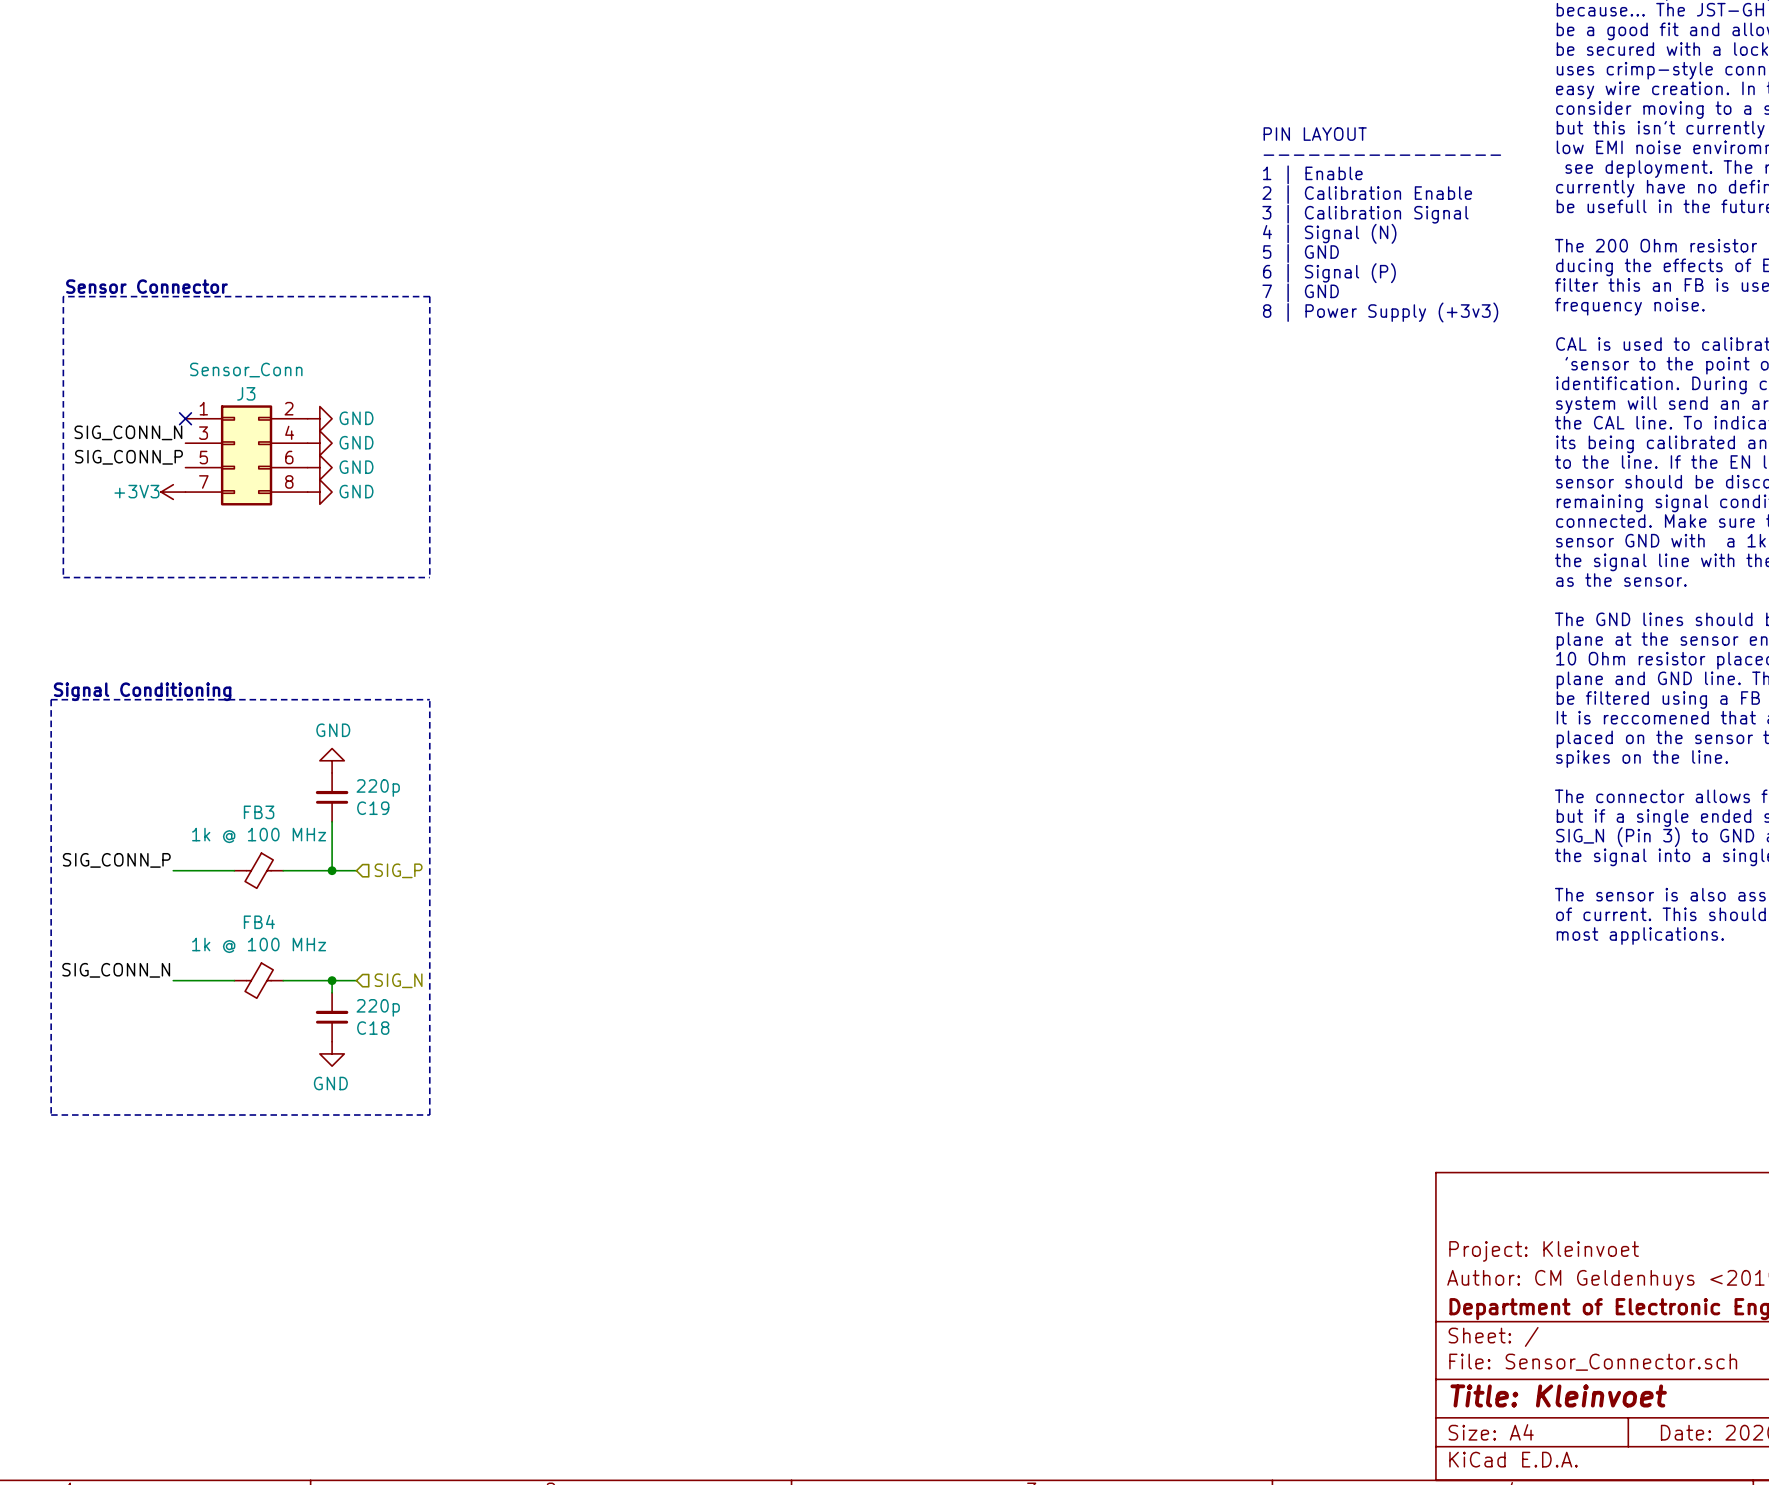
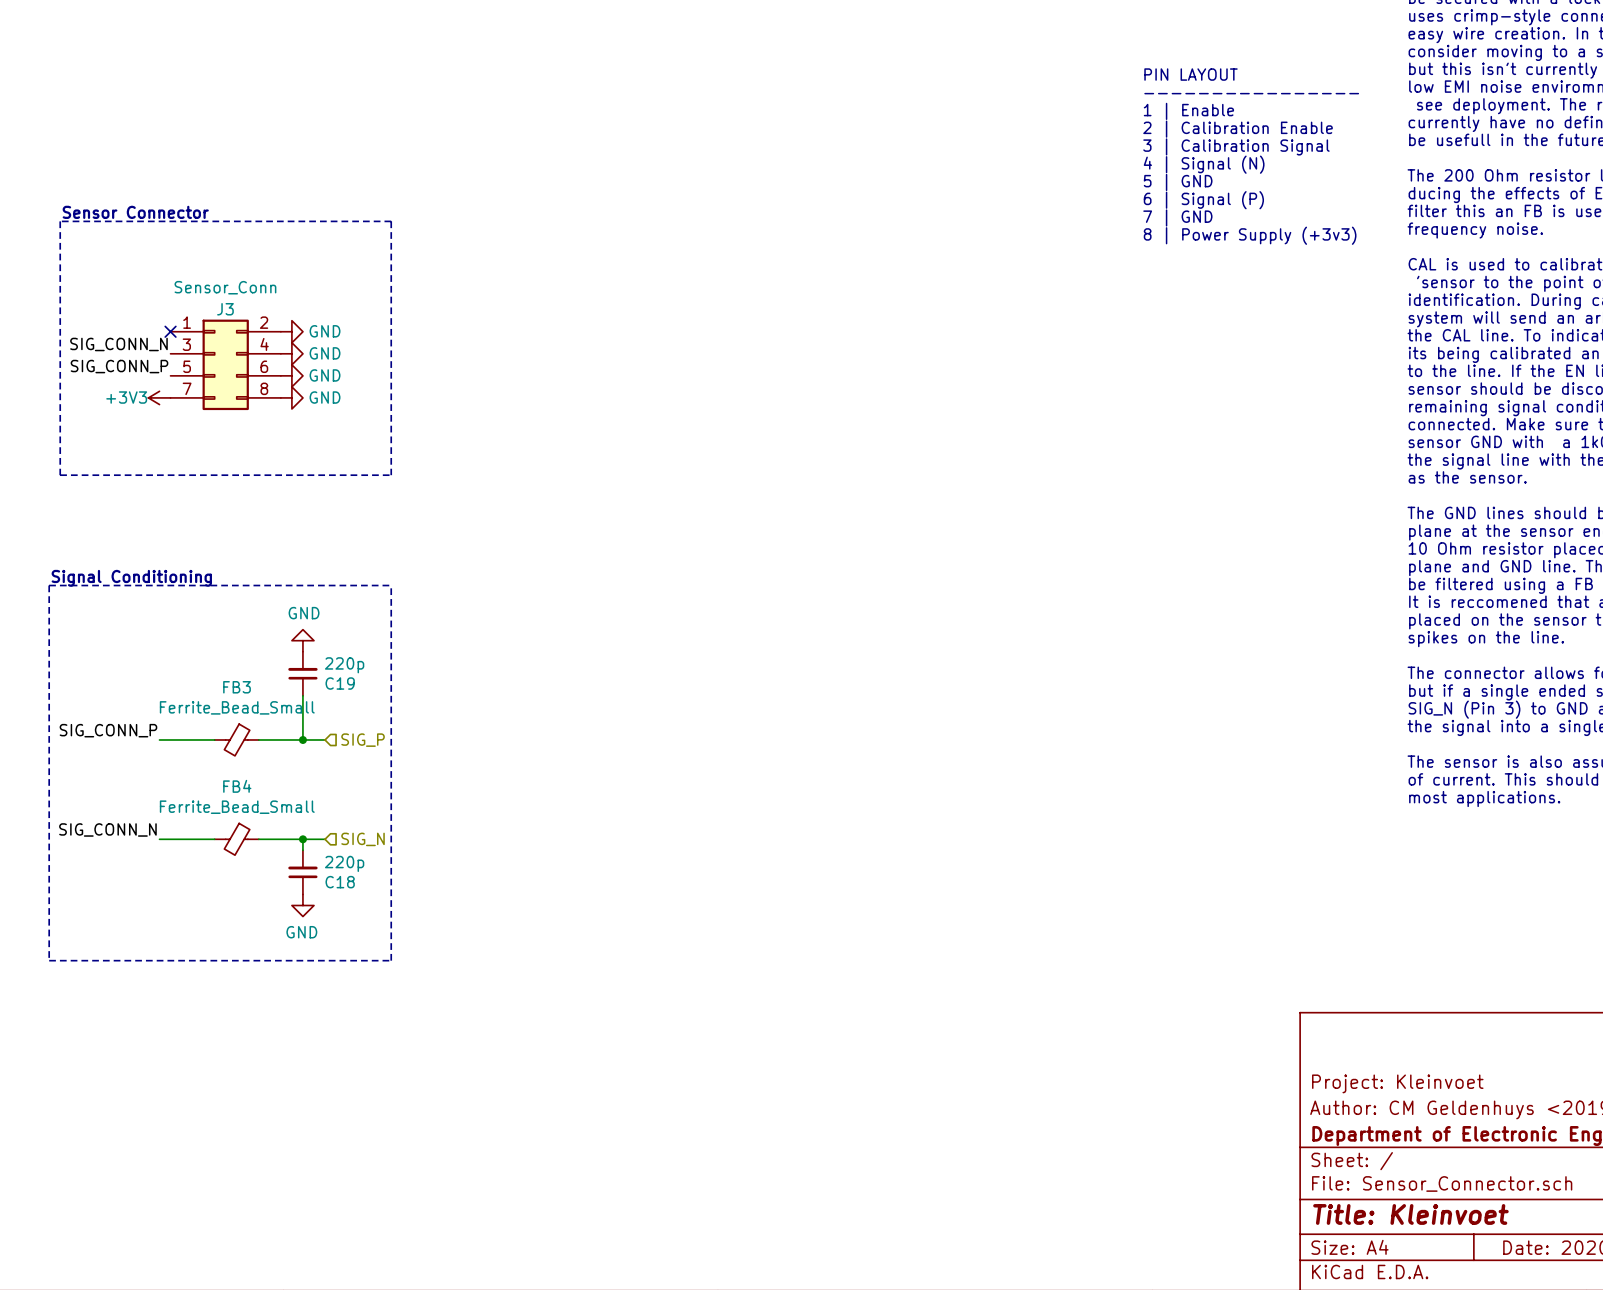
FB3 value: 1k @ 100 MHz (259, 835) -> Ferrite_Bead_Small (237, 707)
FB4 value: 1k @ 100 MHz (259, 945) -> Ferrite_Bead_Small (237, 807)

